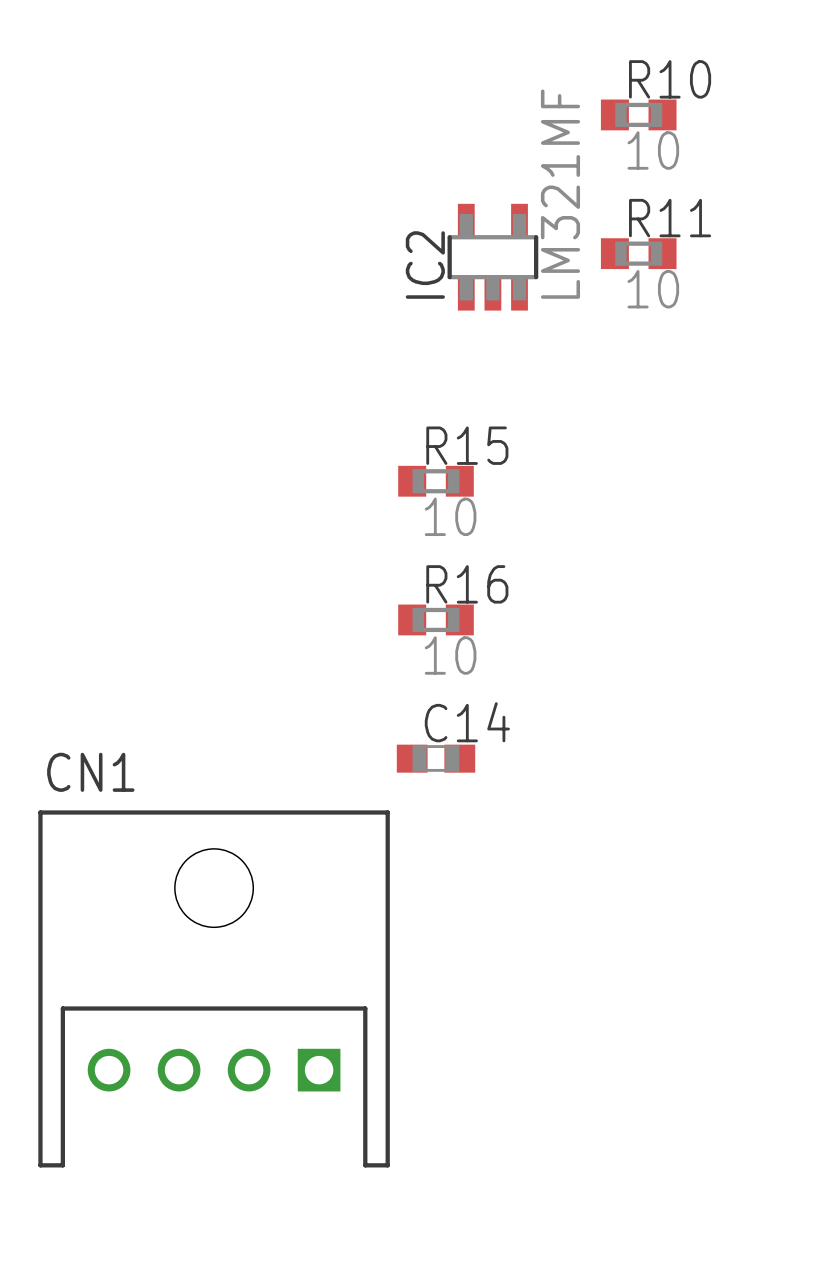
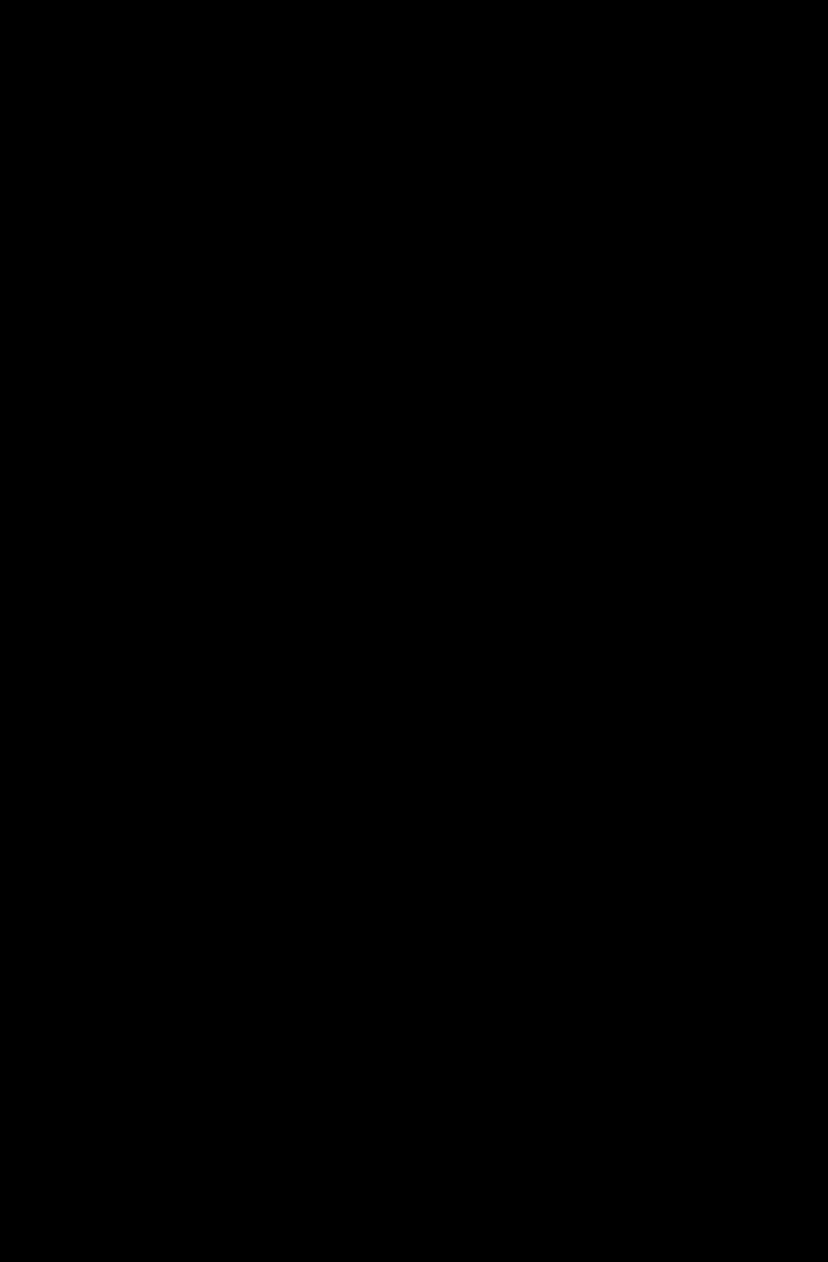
R10: 10 (638, 114) -> none
R11: 10 (638, 253) -> none
IC2: LM321MF (492, 257) -> none
R15: 10 (436, 481) -> none
R16: 10 (436, 619) -> none
C14: (436, 758) -> none
CN1: (214, 988) -> none

